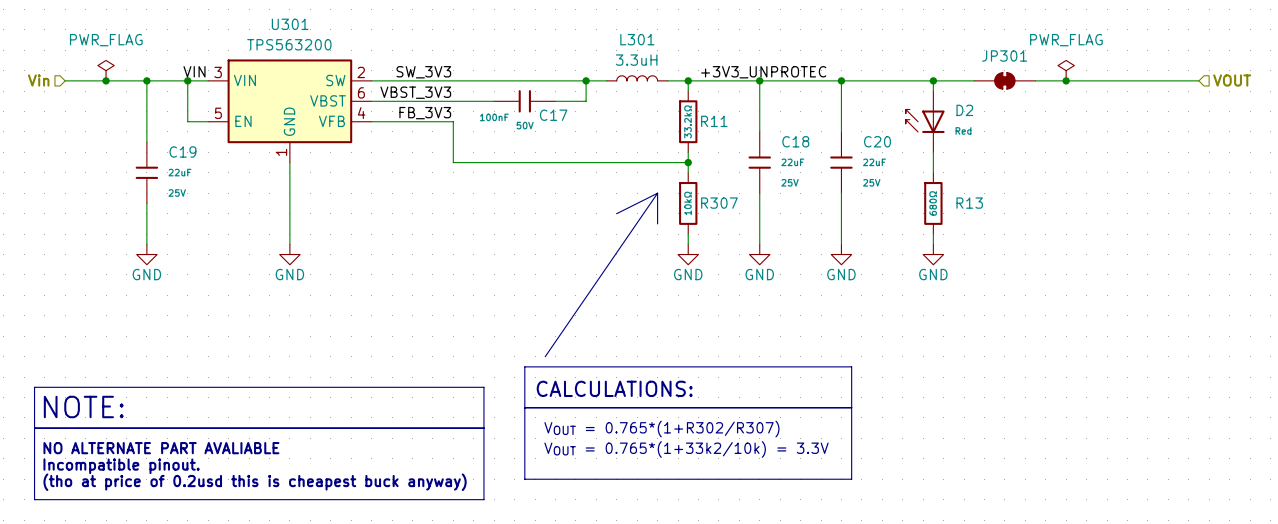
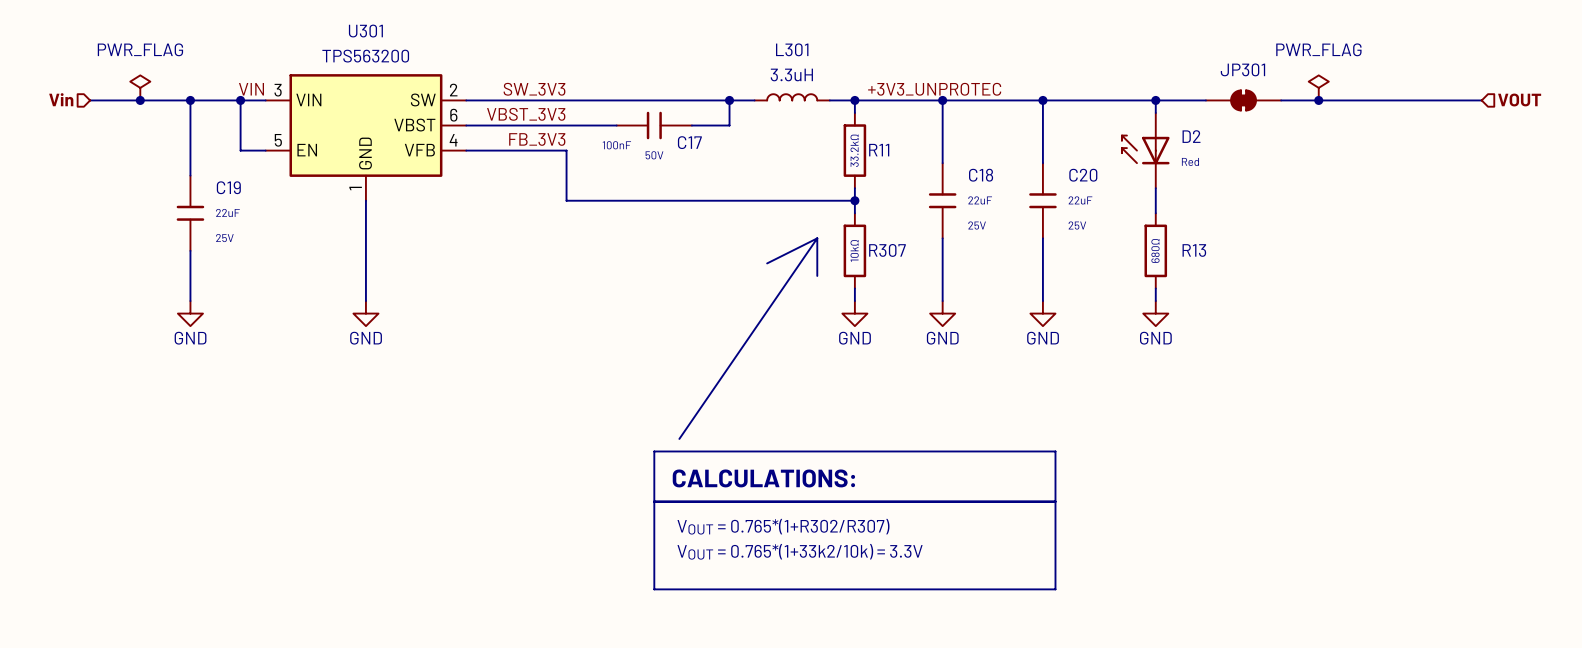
line: (34, 387) (483, 387) (483, 499) (34, 499) (34, 387) -> none
text: NOTE: (83, 407) -> none
line: (34, 428) (483, 428) -> none
text: NO ALTERNATE PART AVALIABLE (161, 448) -> none
text: Incompatible pinout. (121, 466) -> none
text: (tho at price of 0.2usd this is cheapest buck anyway) (255, 482) -> none

